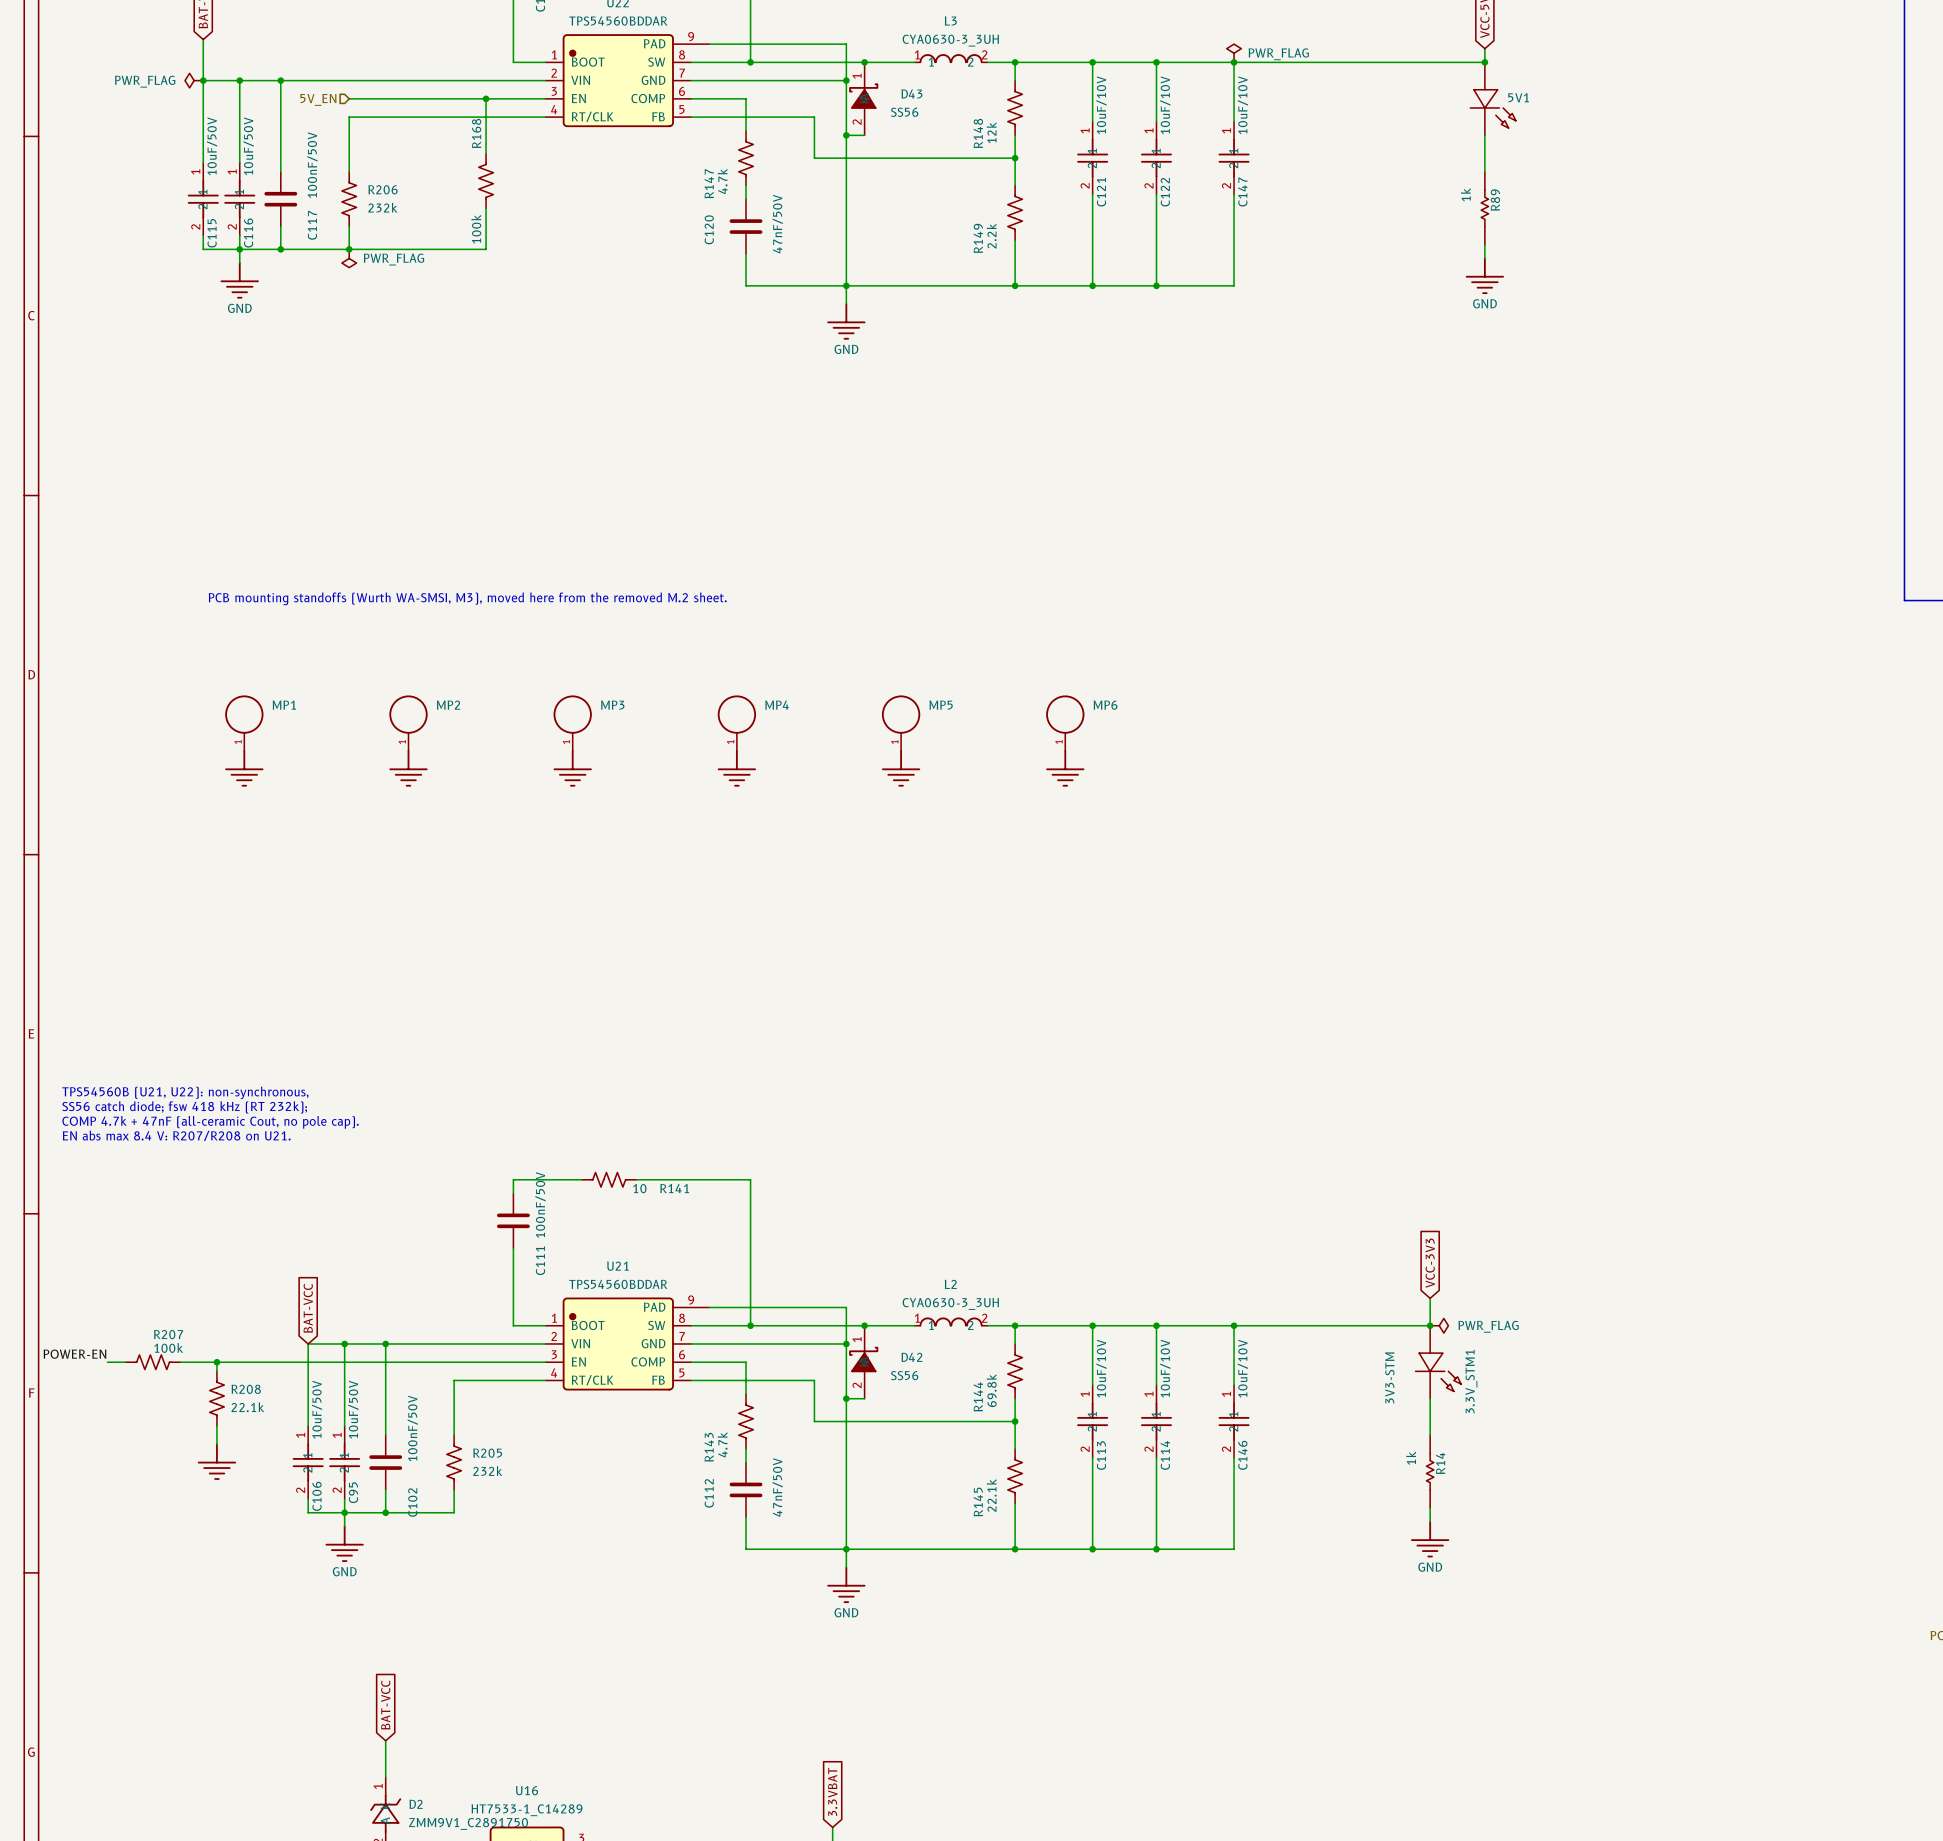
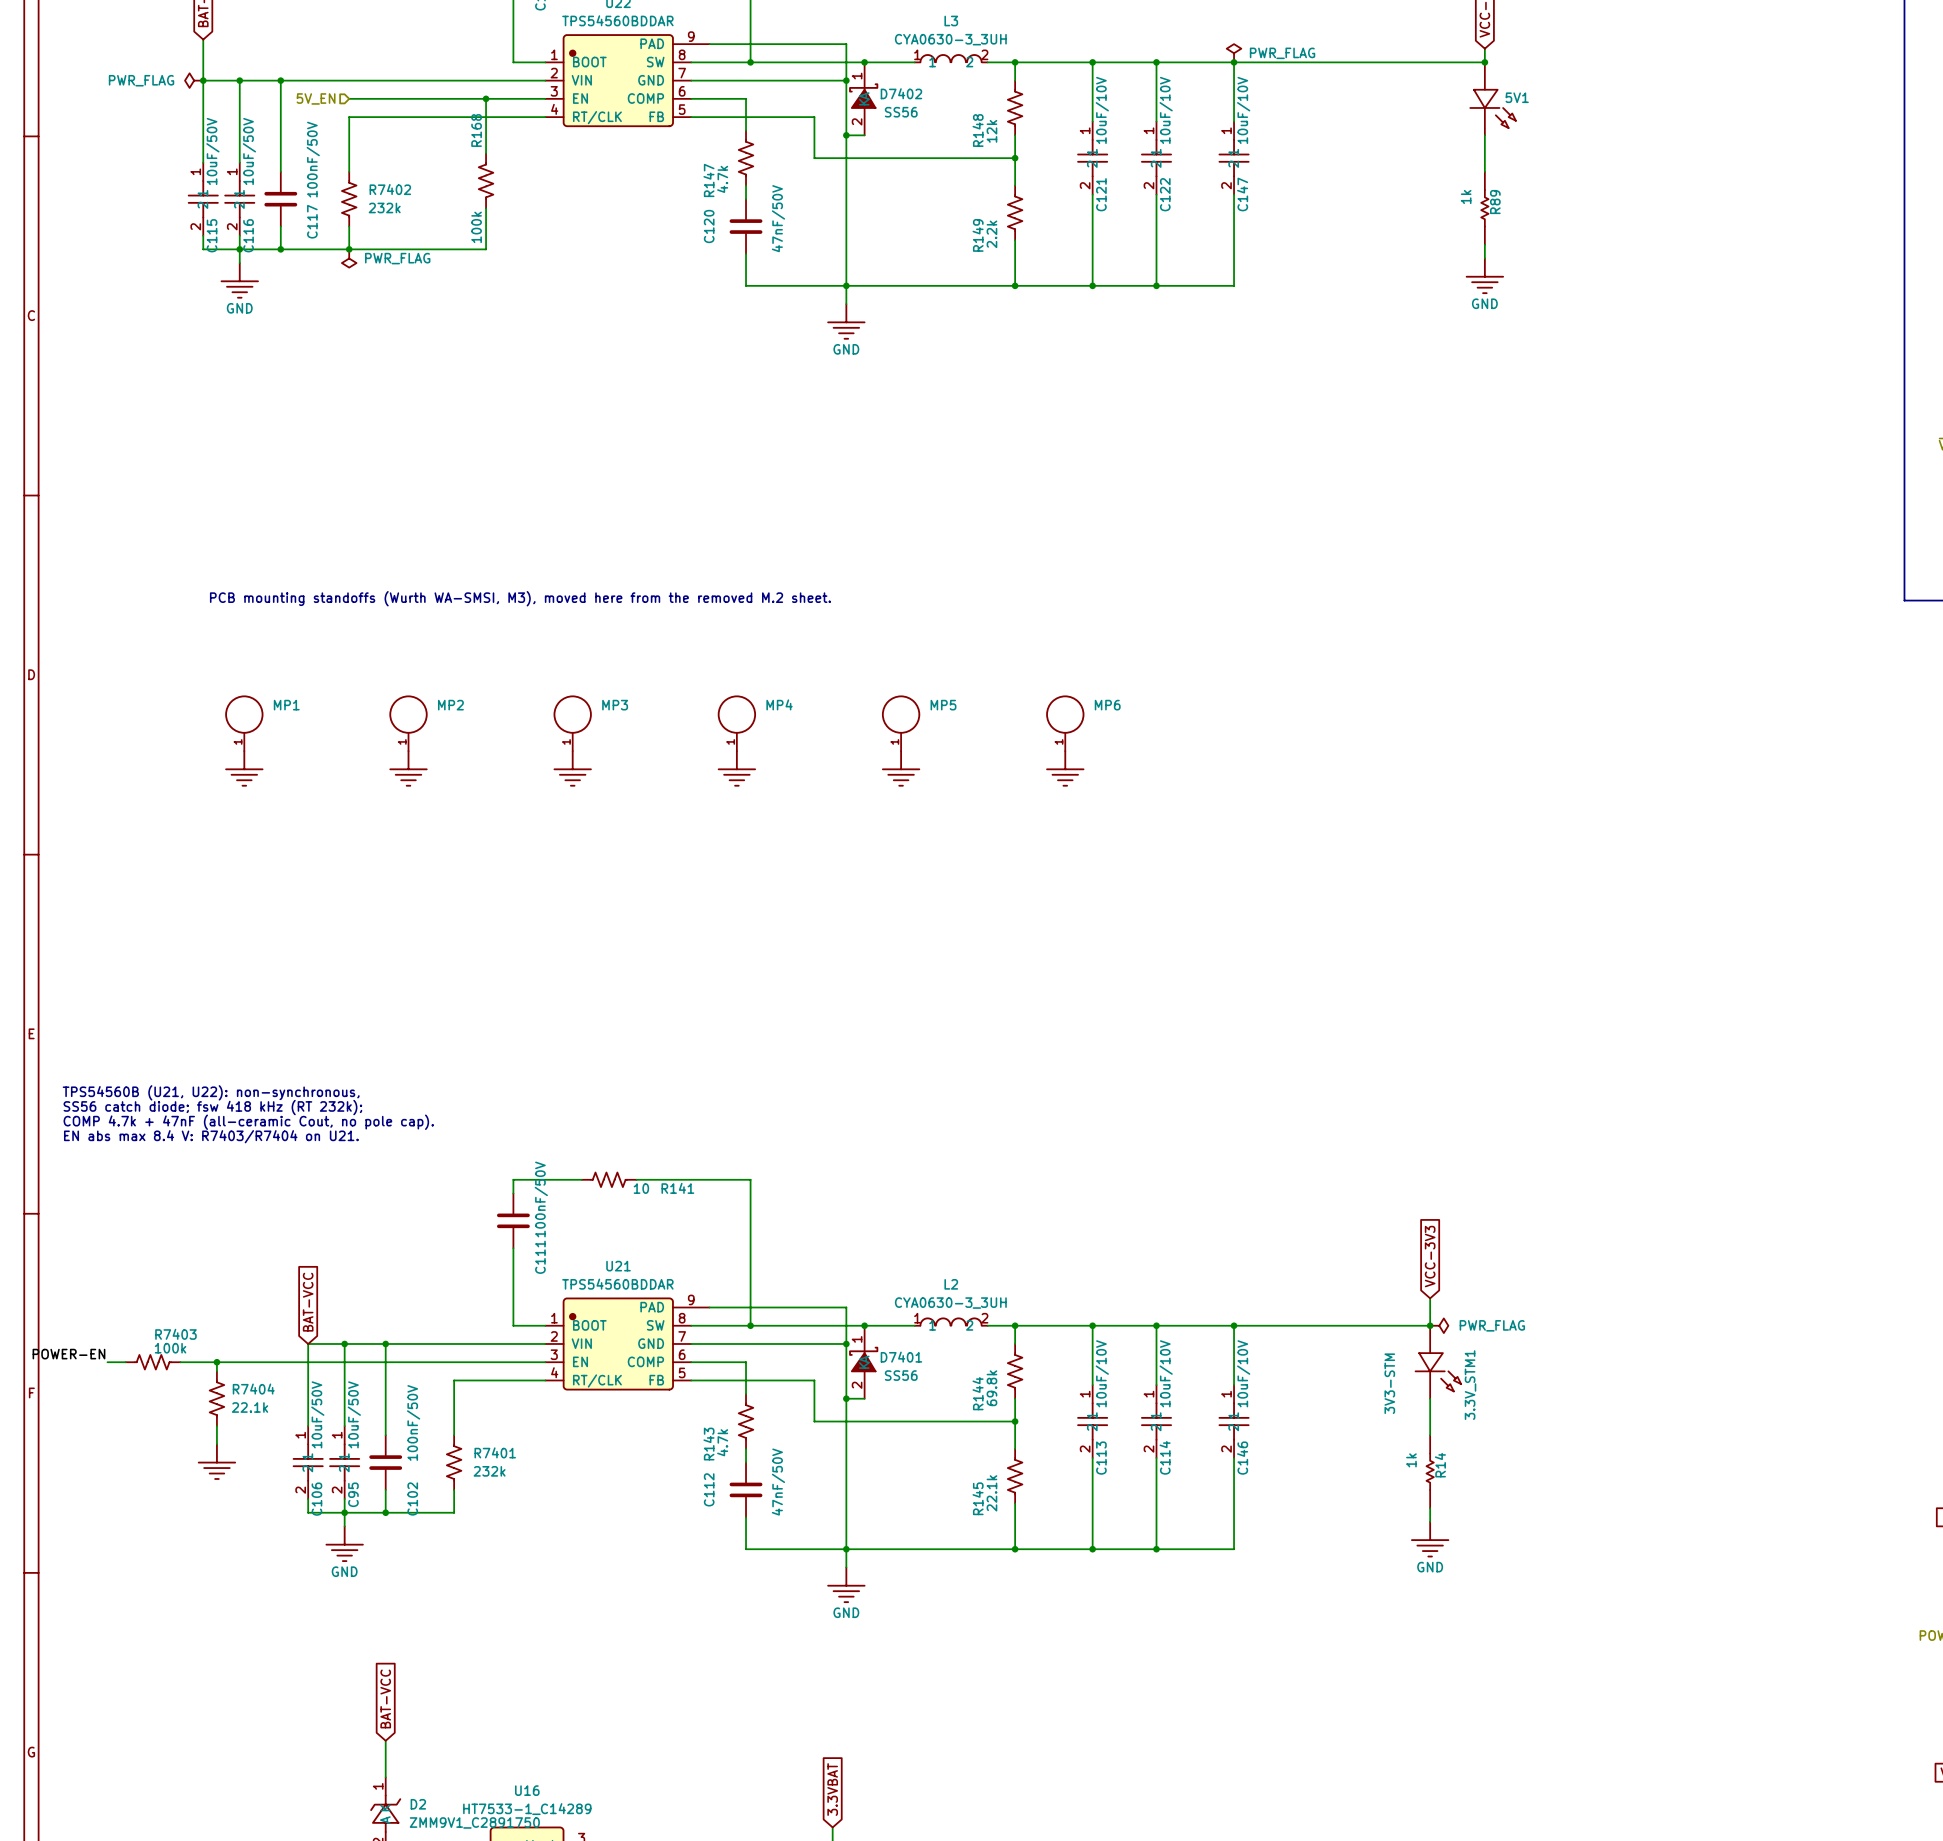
D43 name: D43 (911, 93) -> D7402 (901, 93)
R206 name: R206 (383, 189) -> R7402 (390, 189)
text: EN abs max 8.4 V: R207/R208 on U21. (176, 1135) -> EN abs max 8.4 V: R7403/R7404 on U21. (211, 1136)
R207 name: R207 (168, 1334) -> R7403 (175, 1334)
D42 name: D42 (911, 1357) -> D7401 (901, 1357)
R208 name: R208 (246, 1389) -> R7404 (253, 1389)
R205 name: R205 (487, 1453) -> R7401 (495, 1452)

